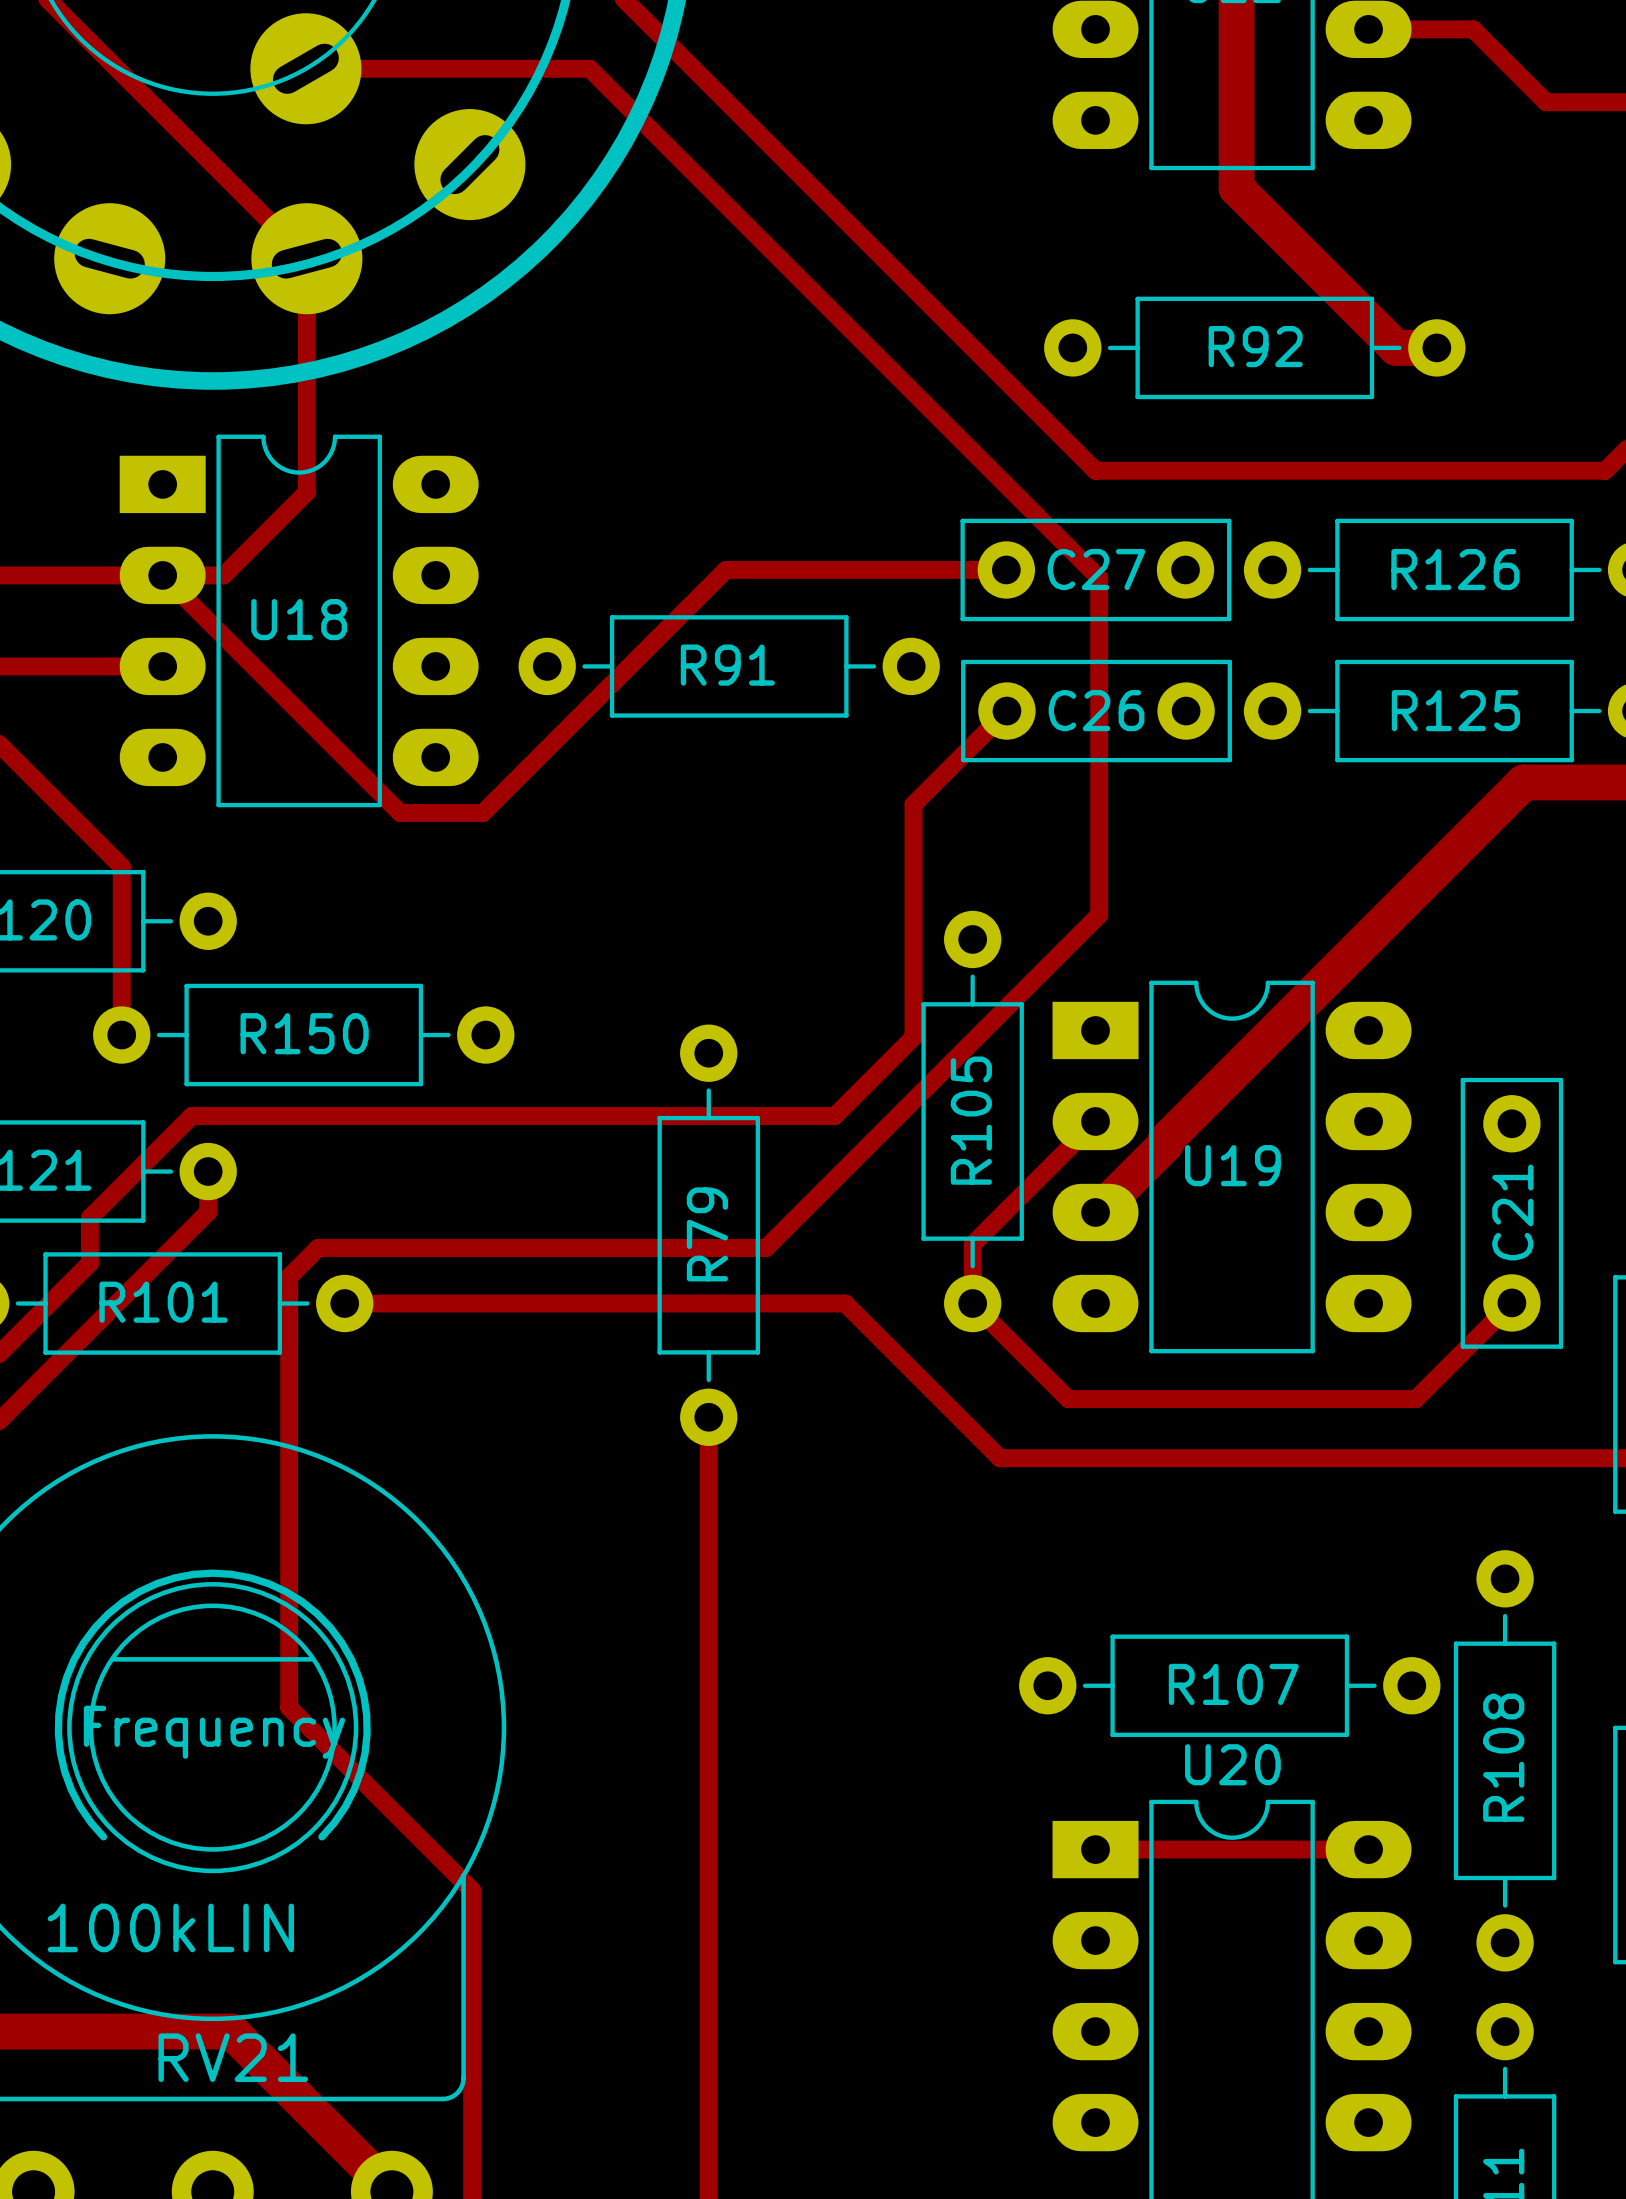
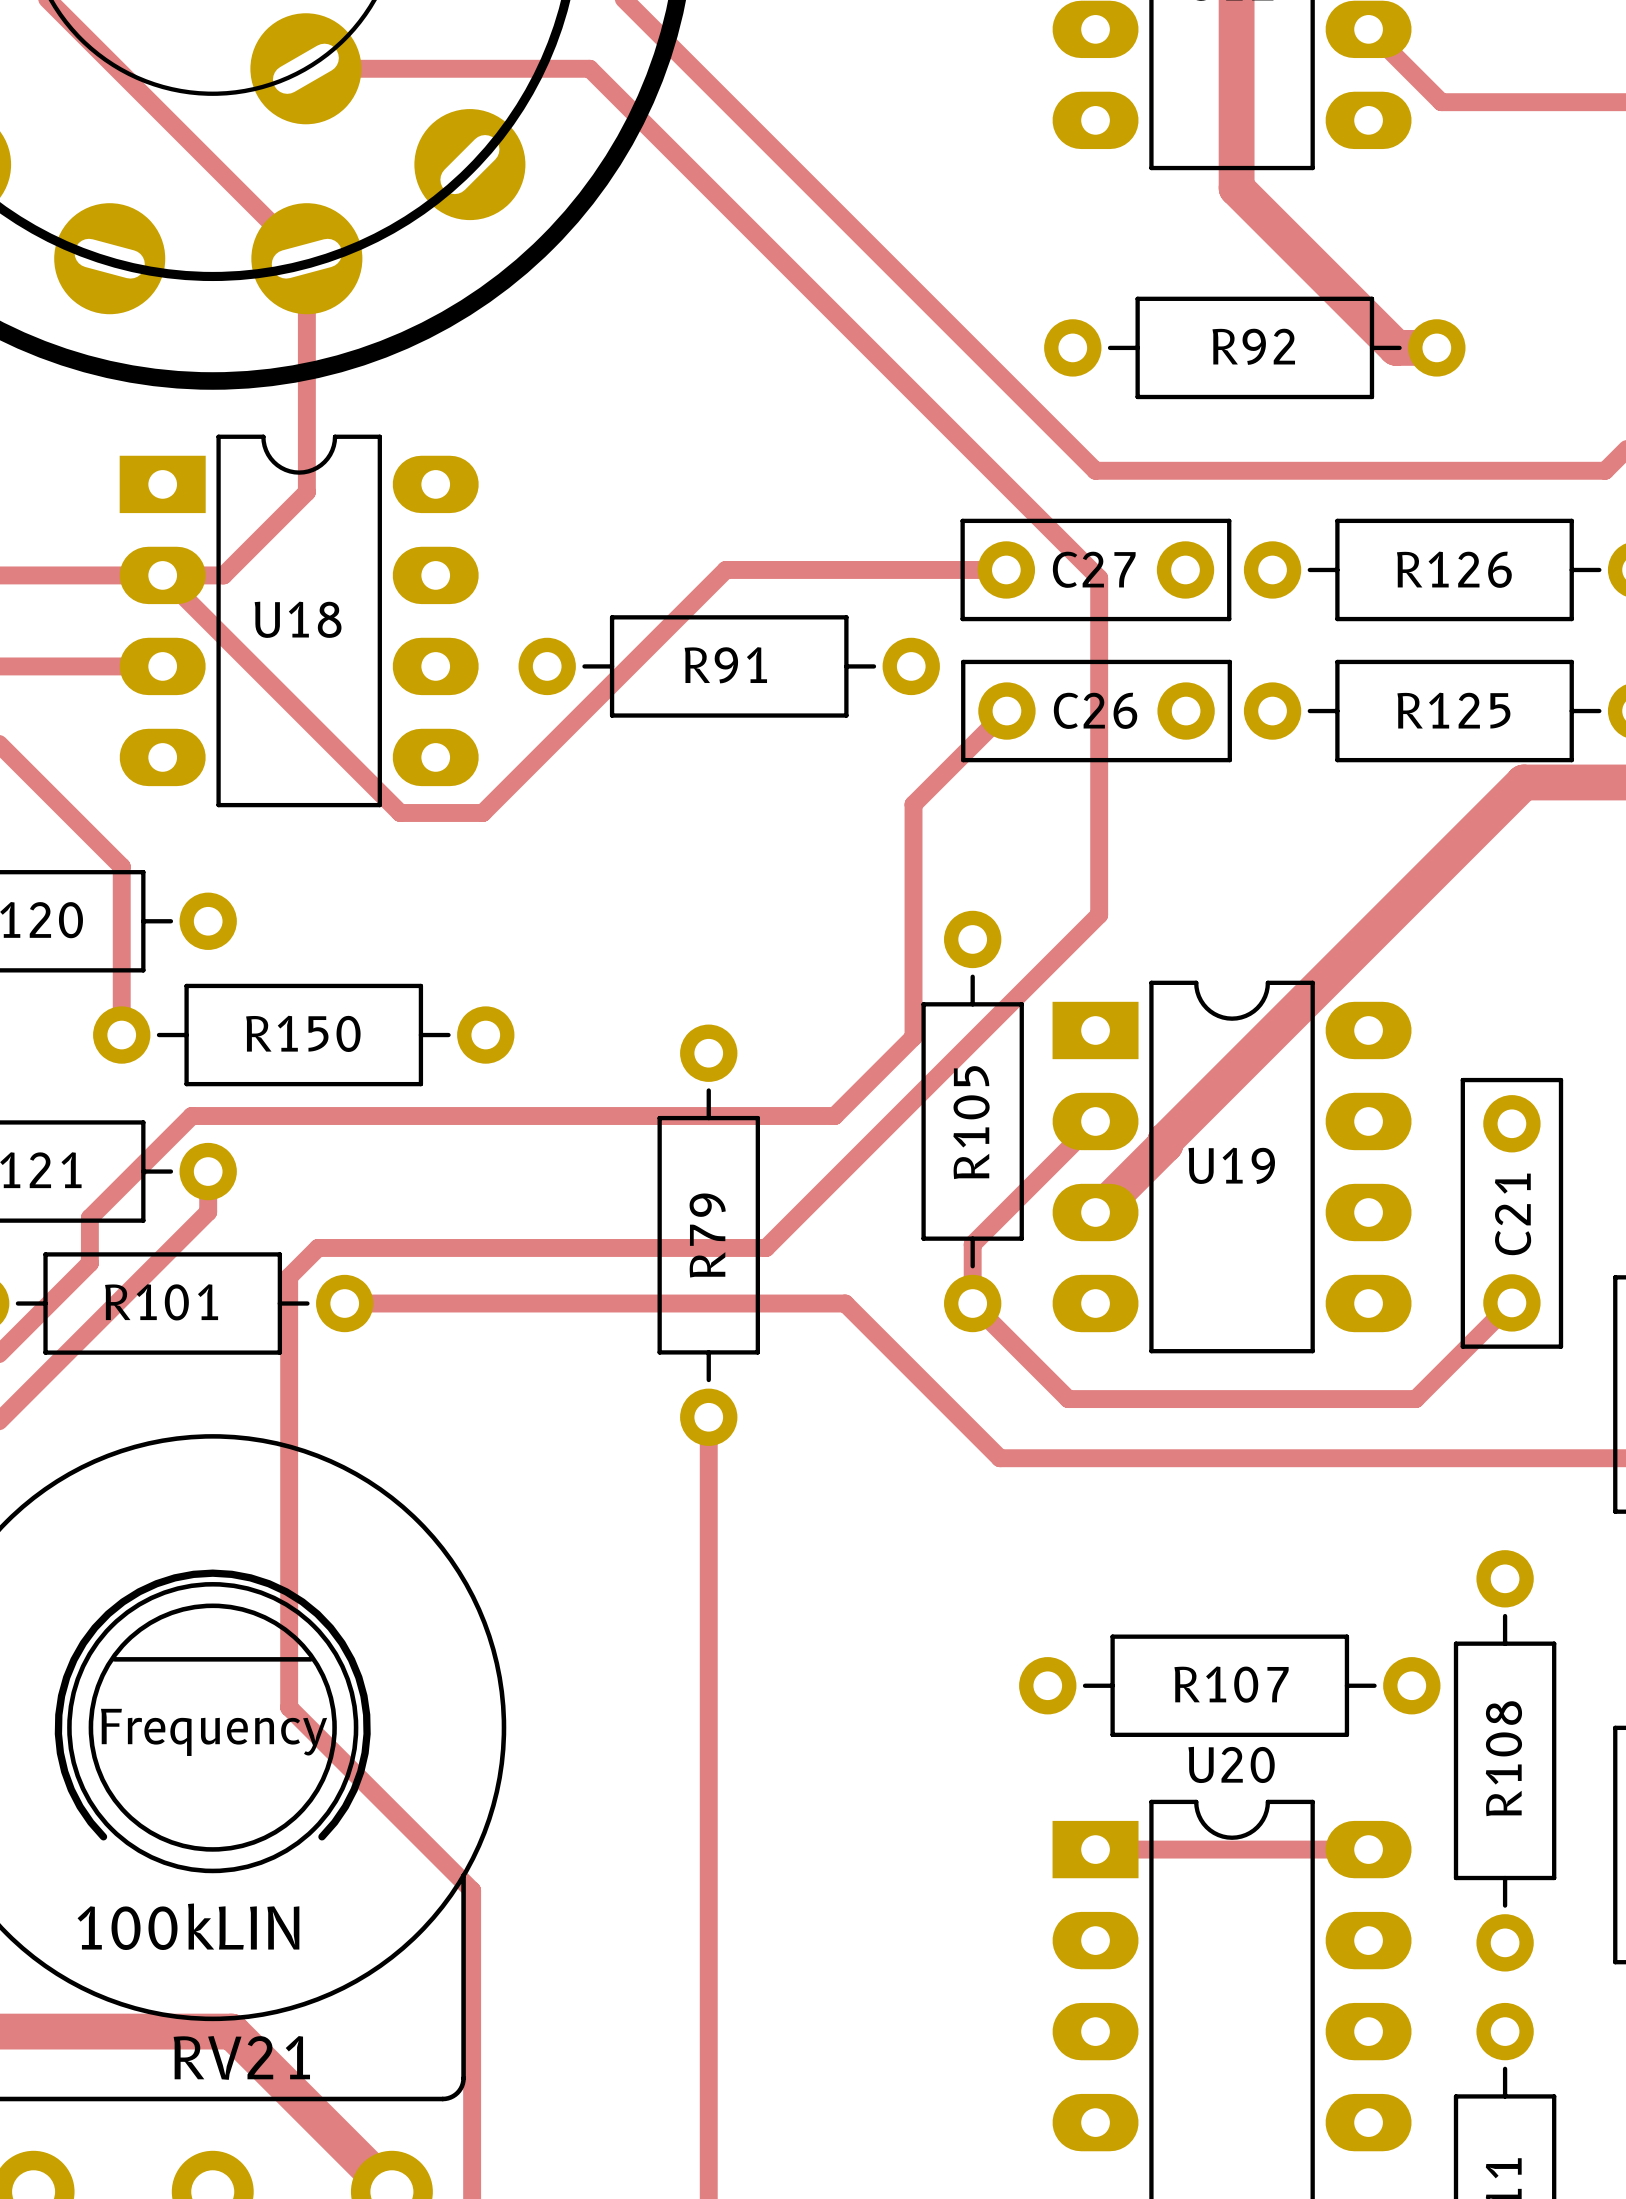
track: (1368, 29) (1473, 29) (1546, 102) -> (1368, 29) (1441, 102) (1546, 102)

